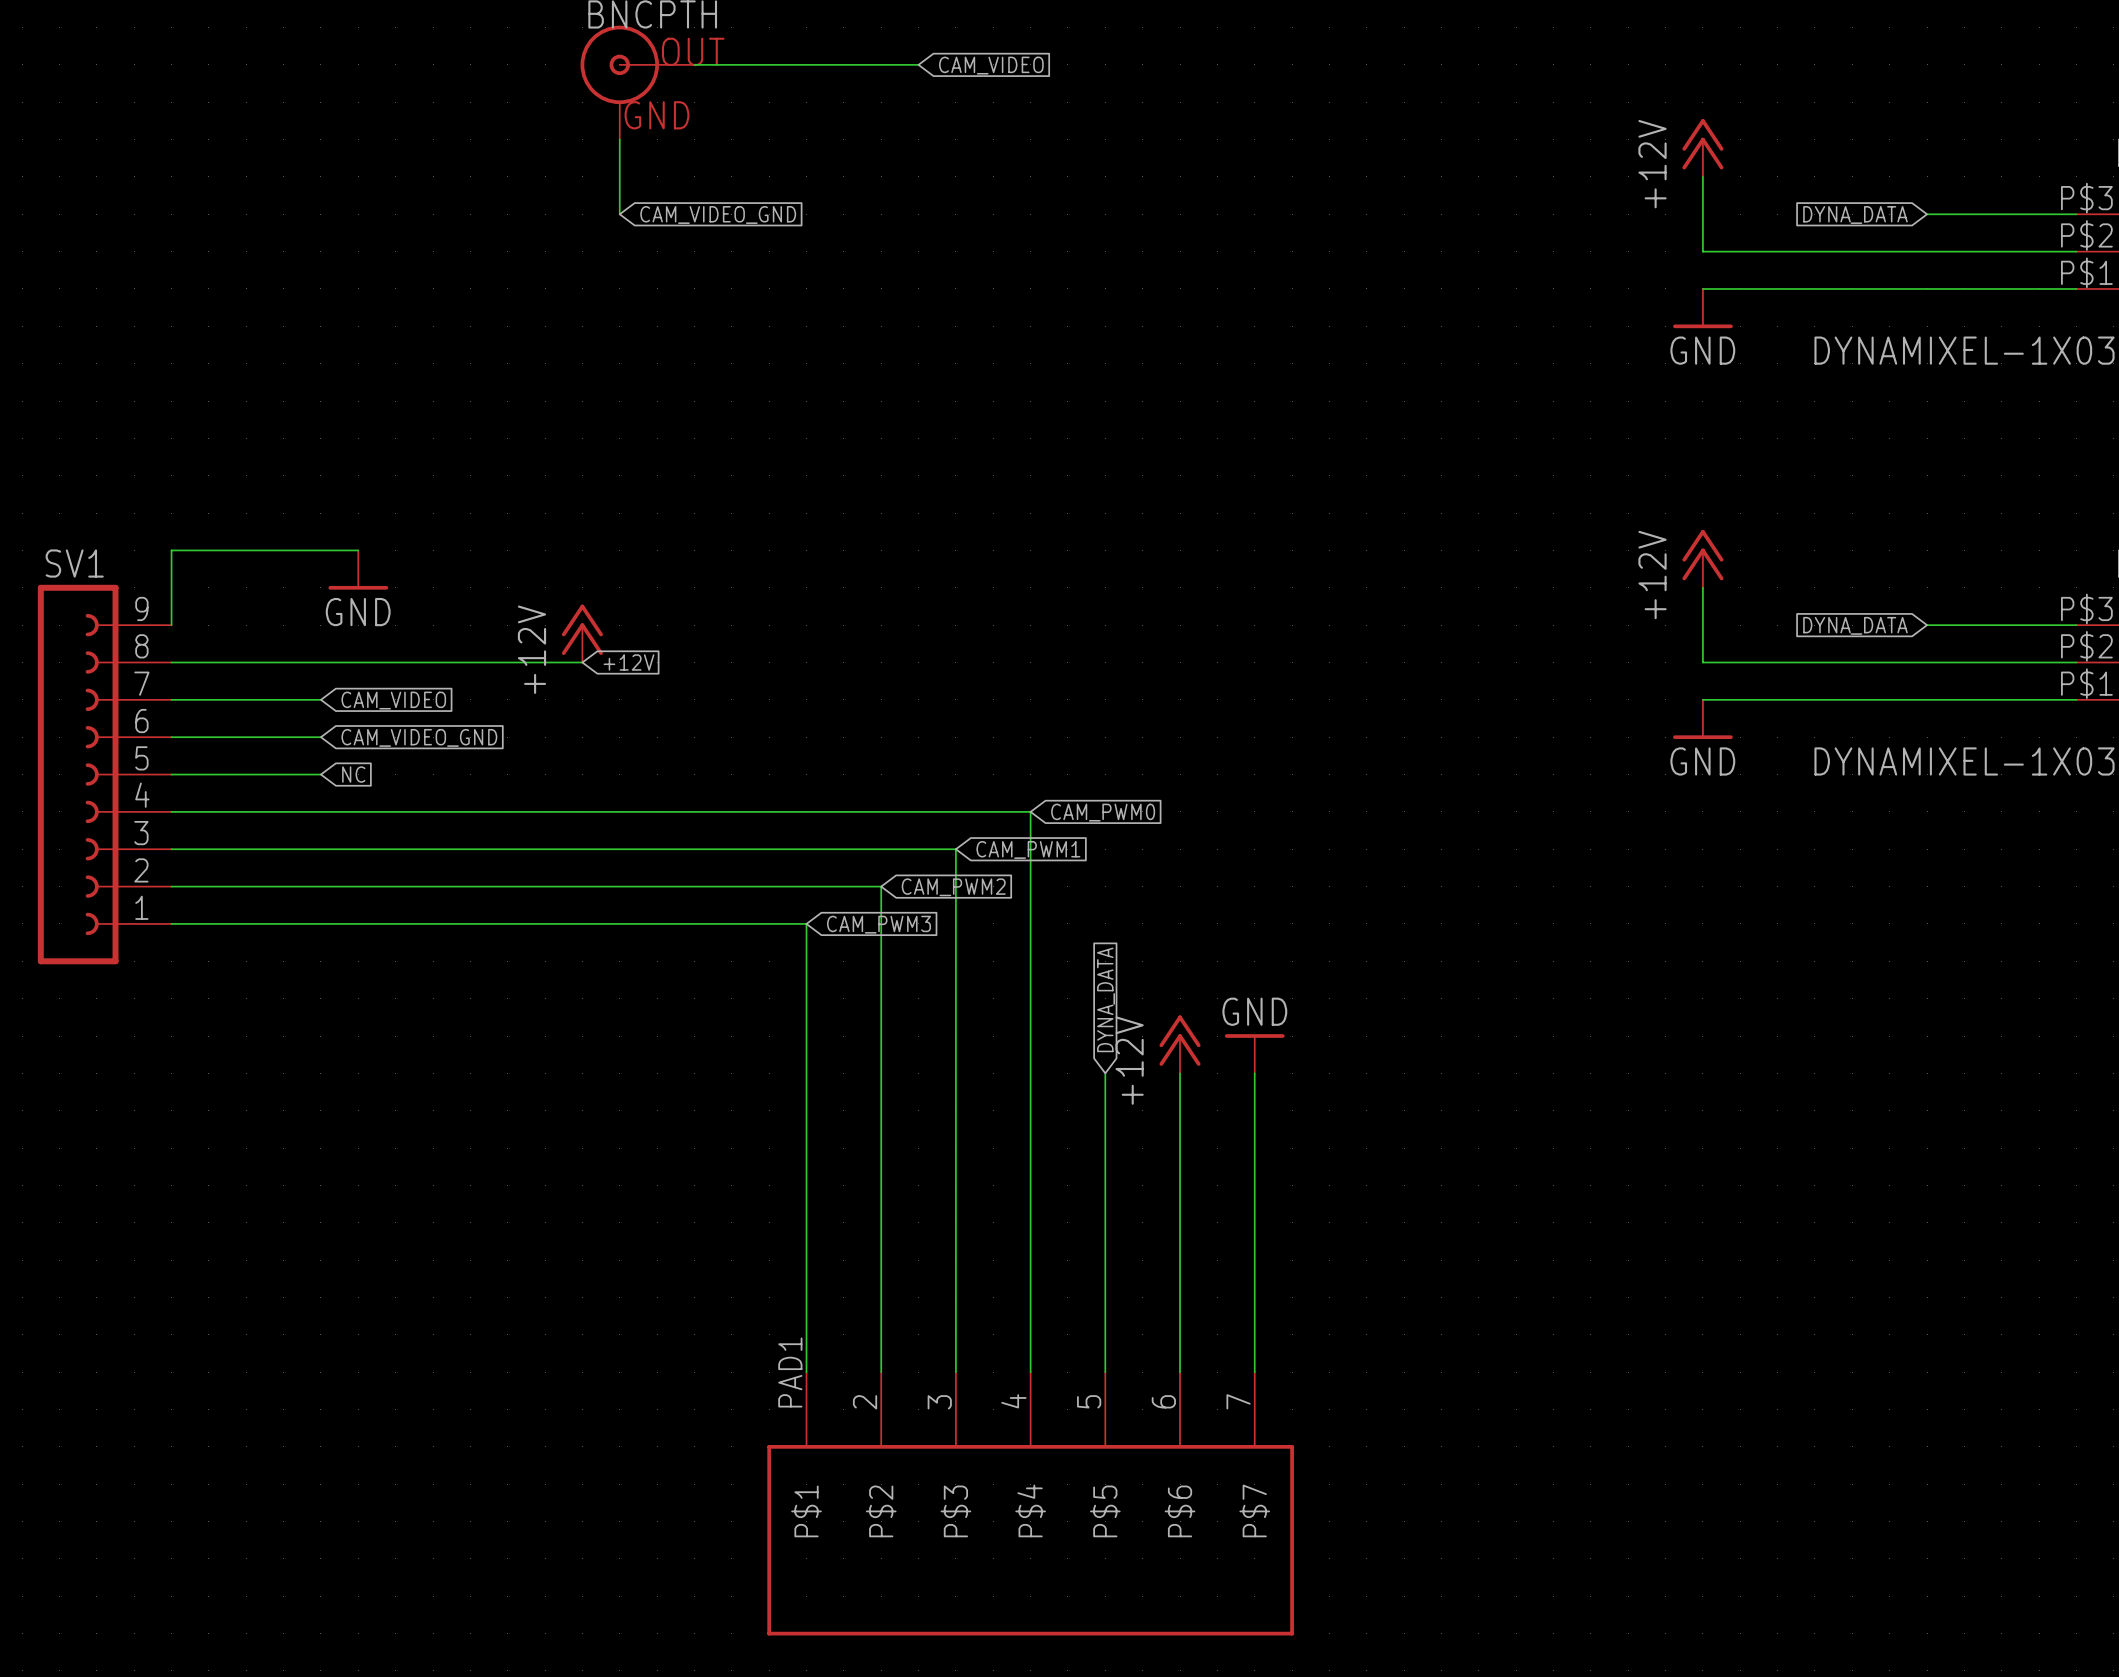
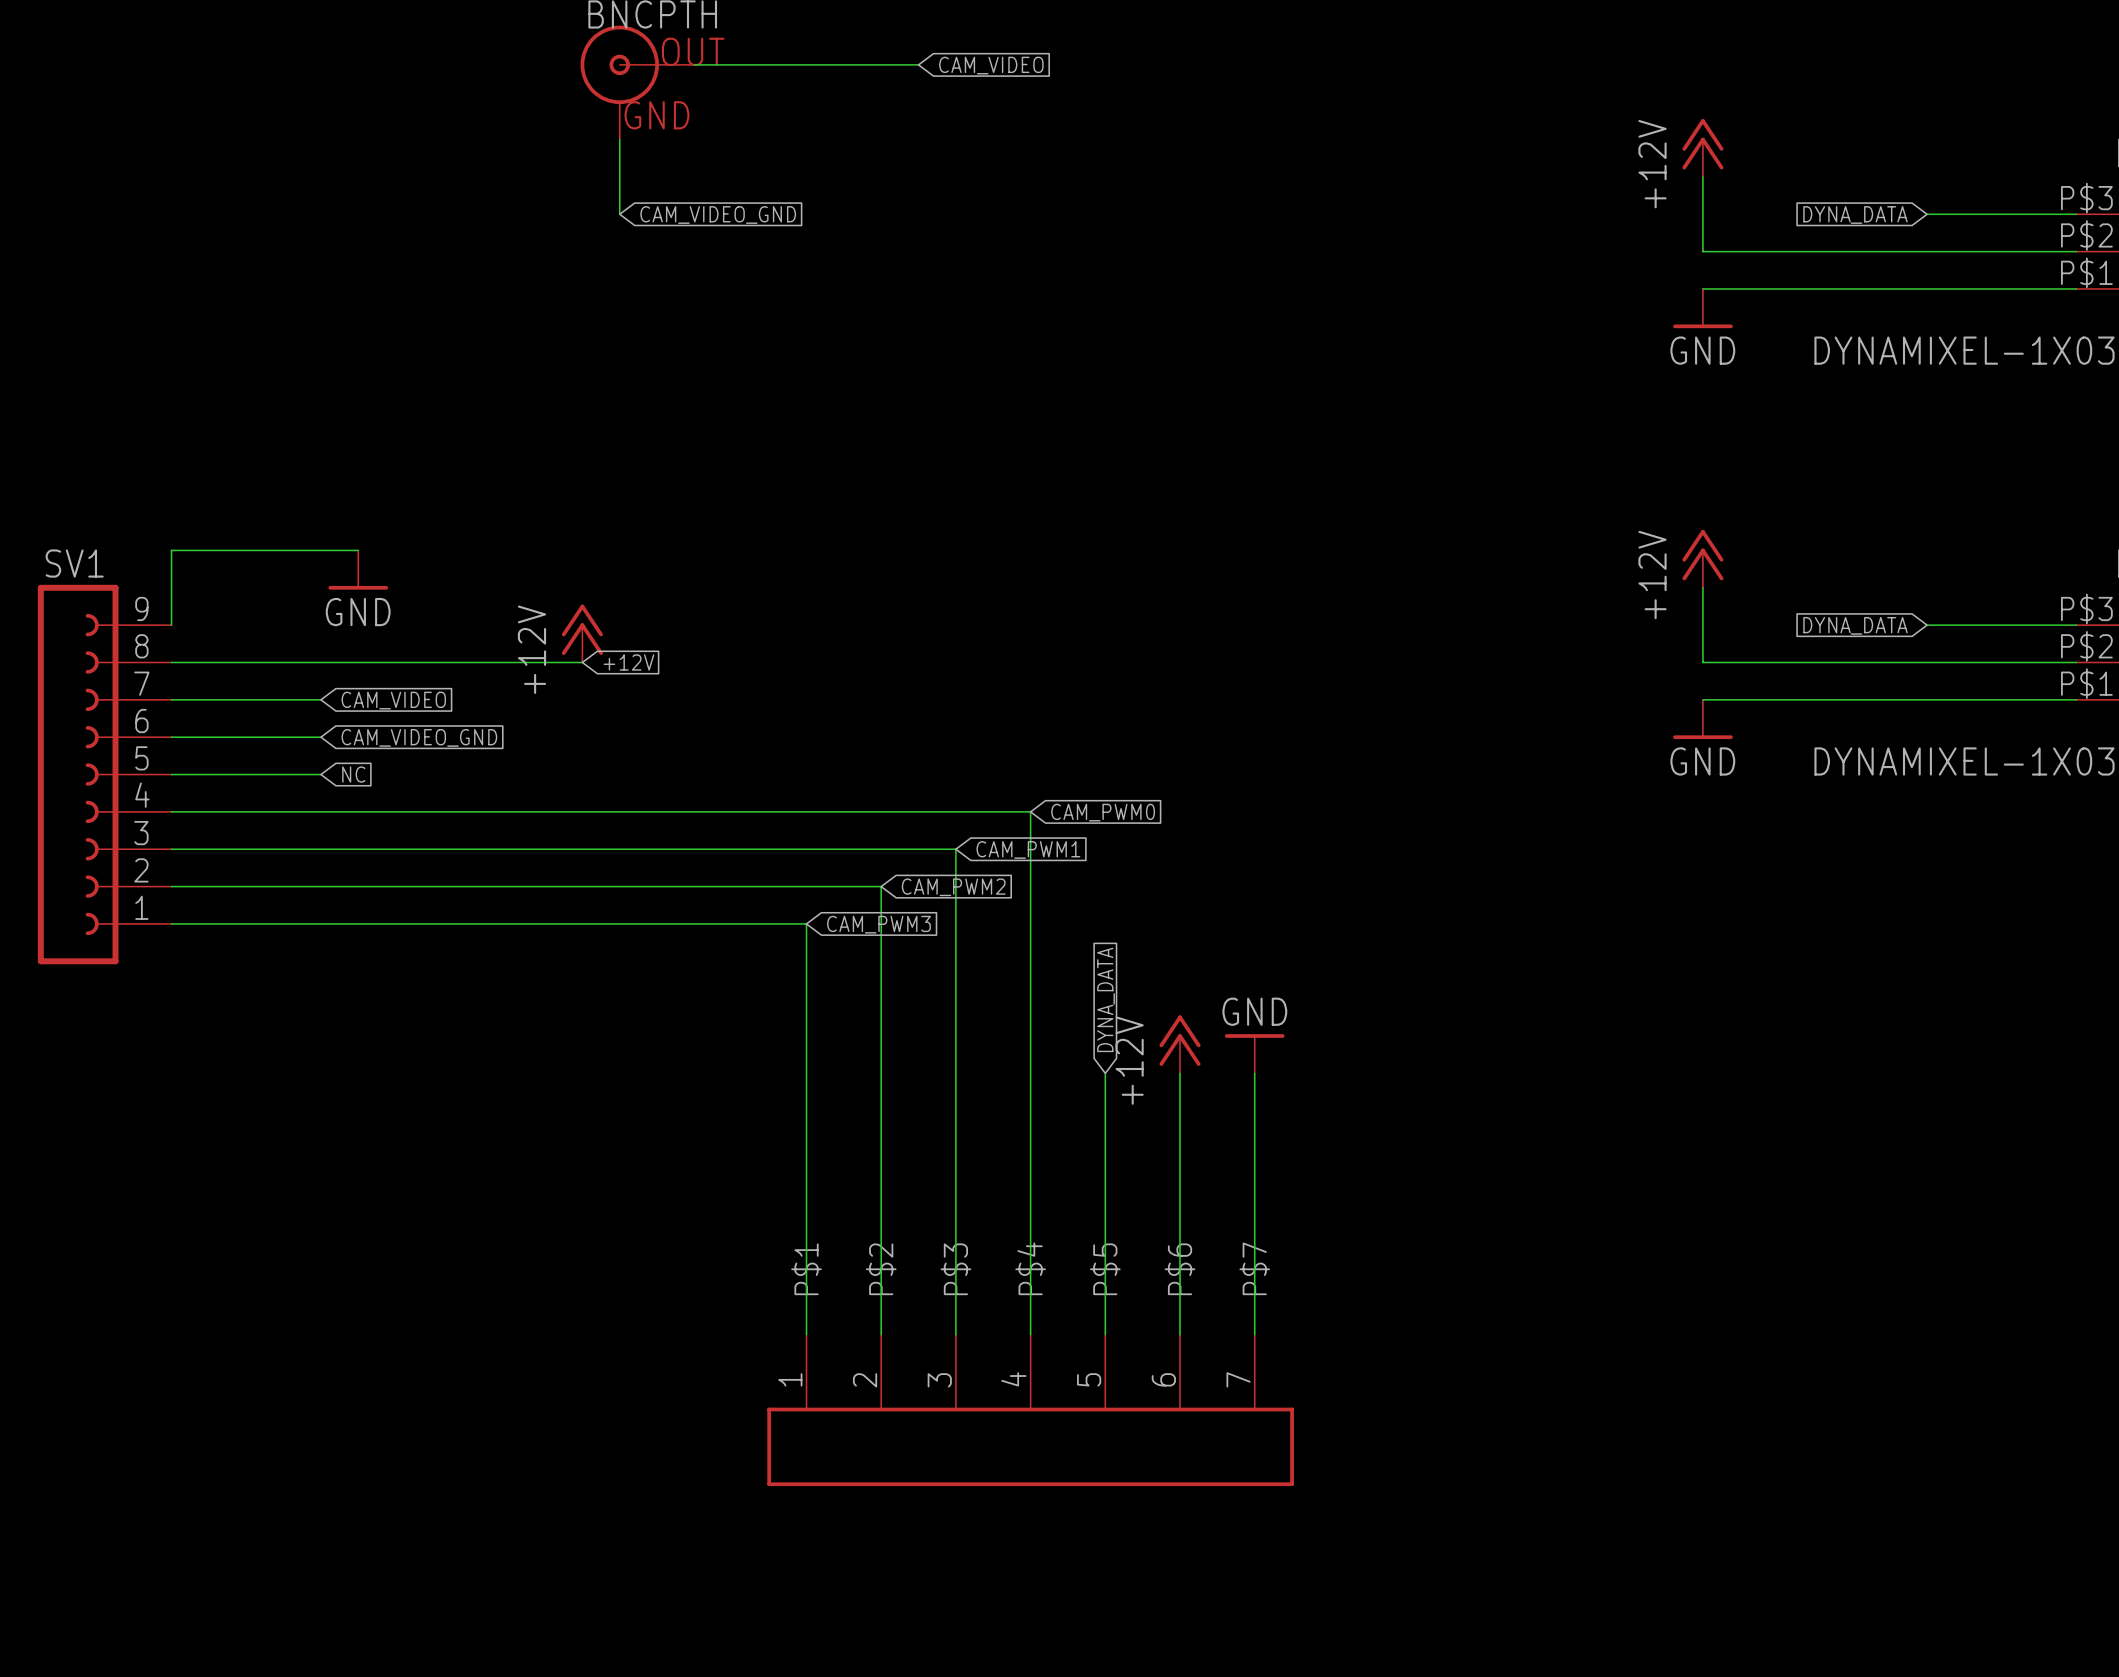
part: none -> (1030, 1410)
part: (1030, 1503) -> none

